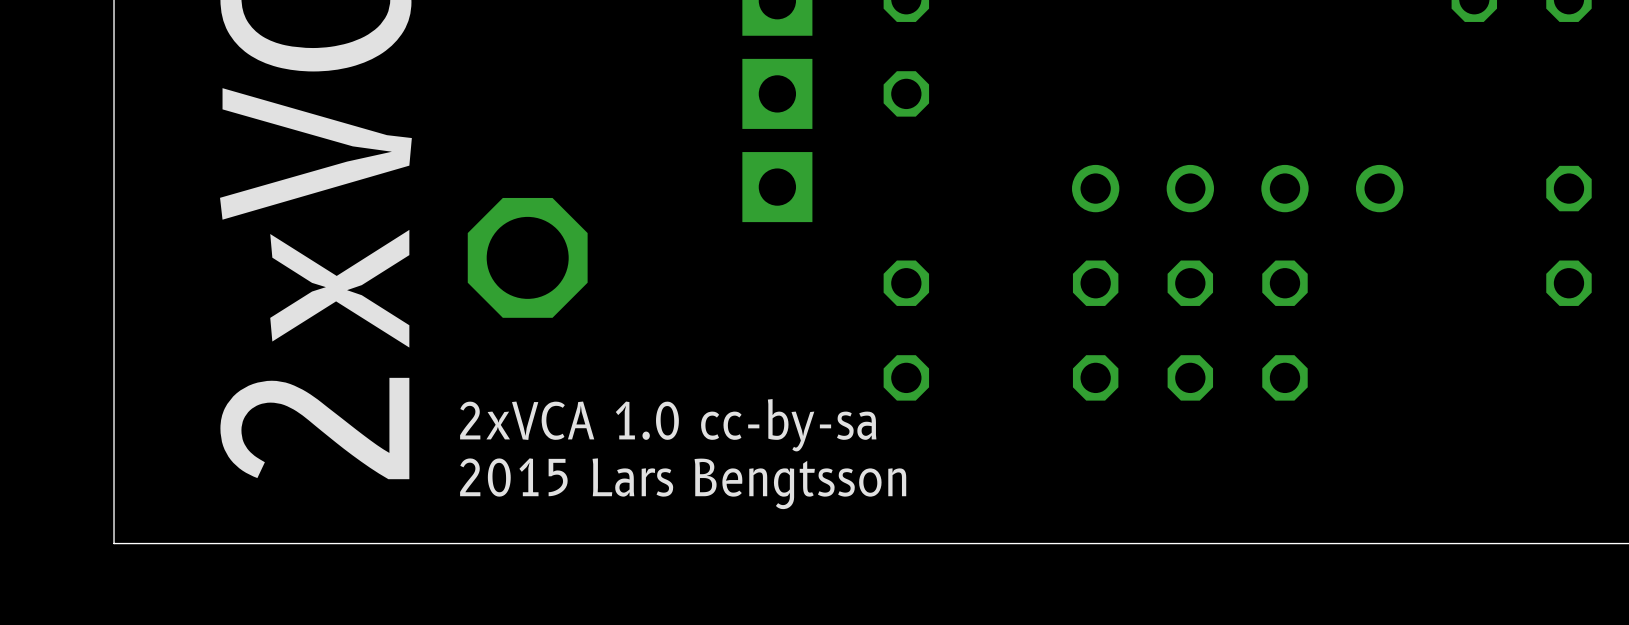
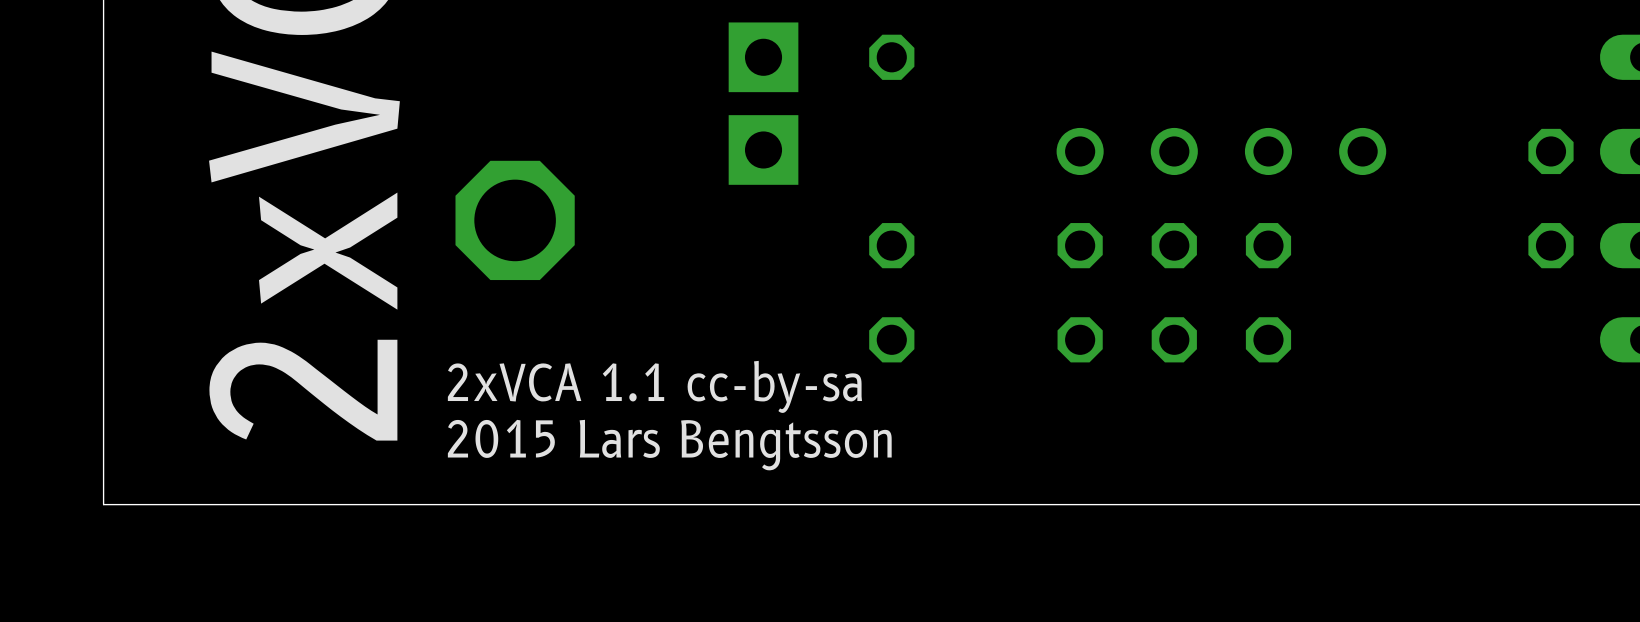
text: 2xVCA 1.0 cc-by-sa (668, 425) -> 2xVCA 1.1 cc-by-sa (654, 386)

